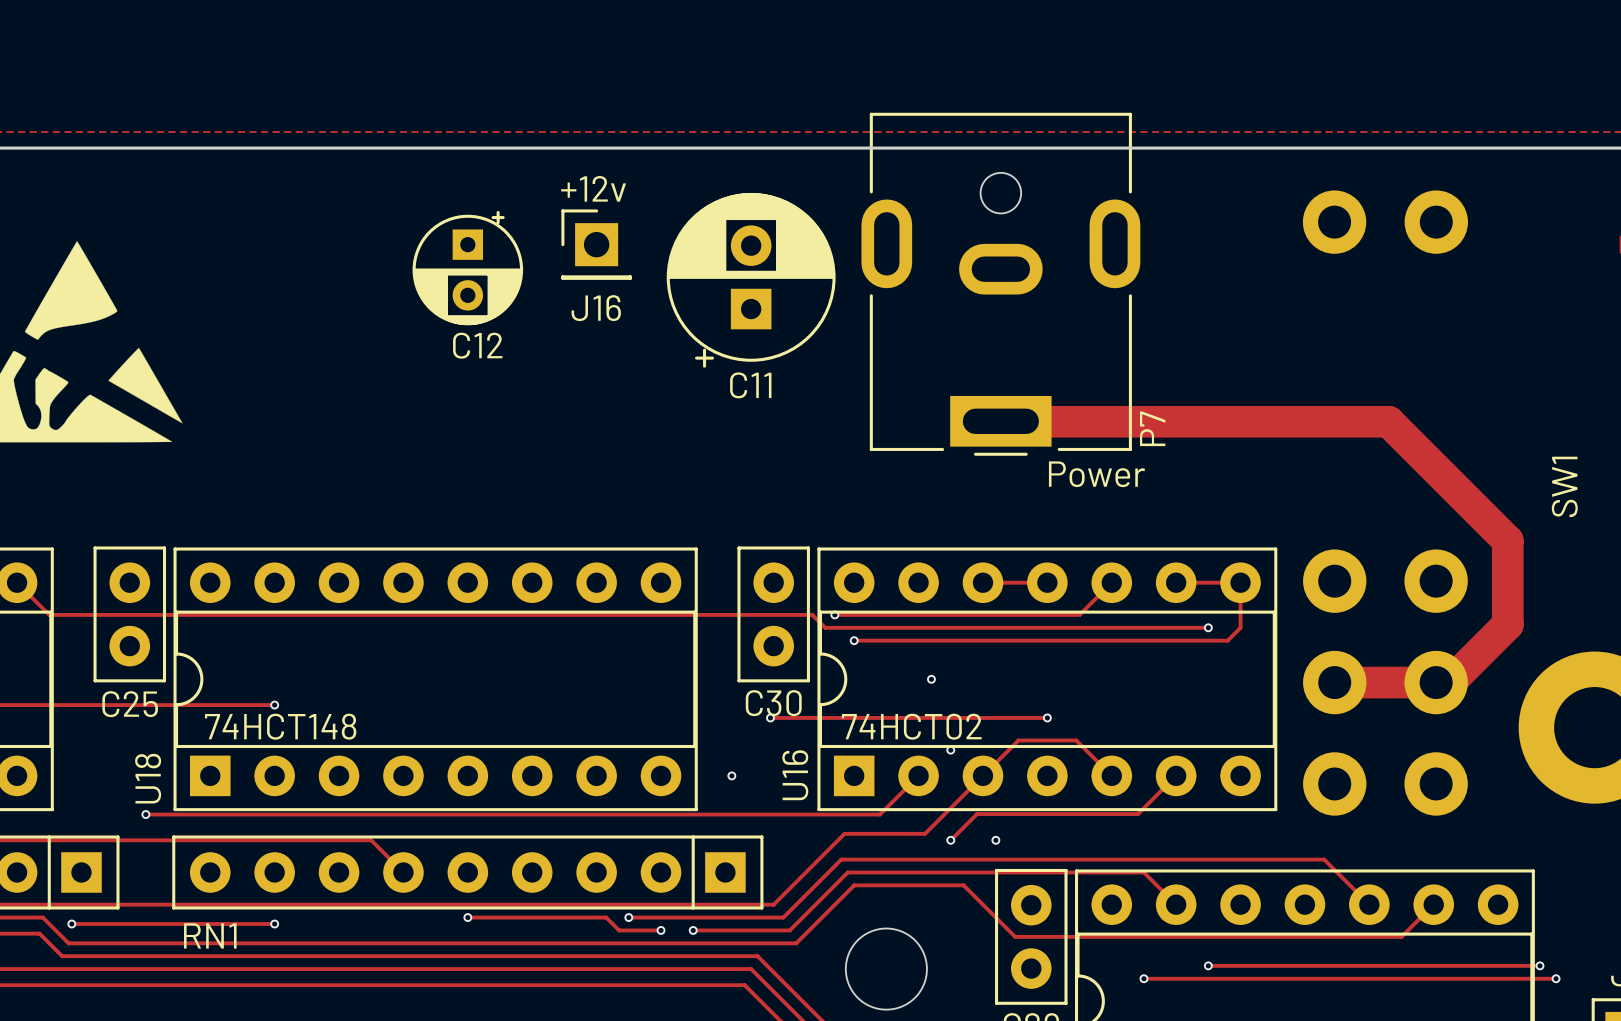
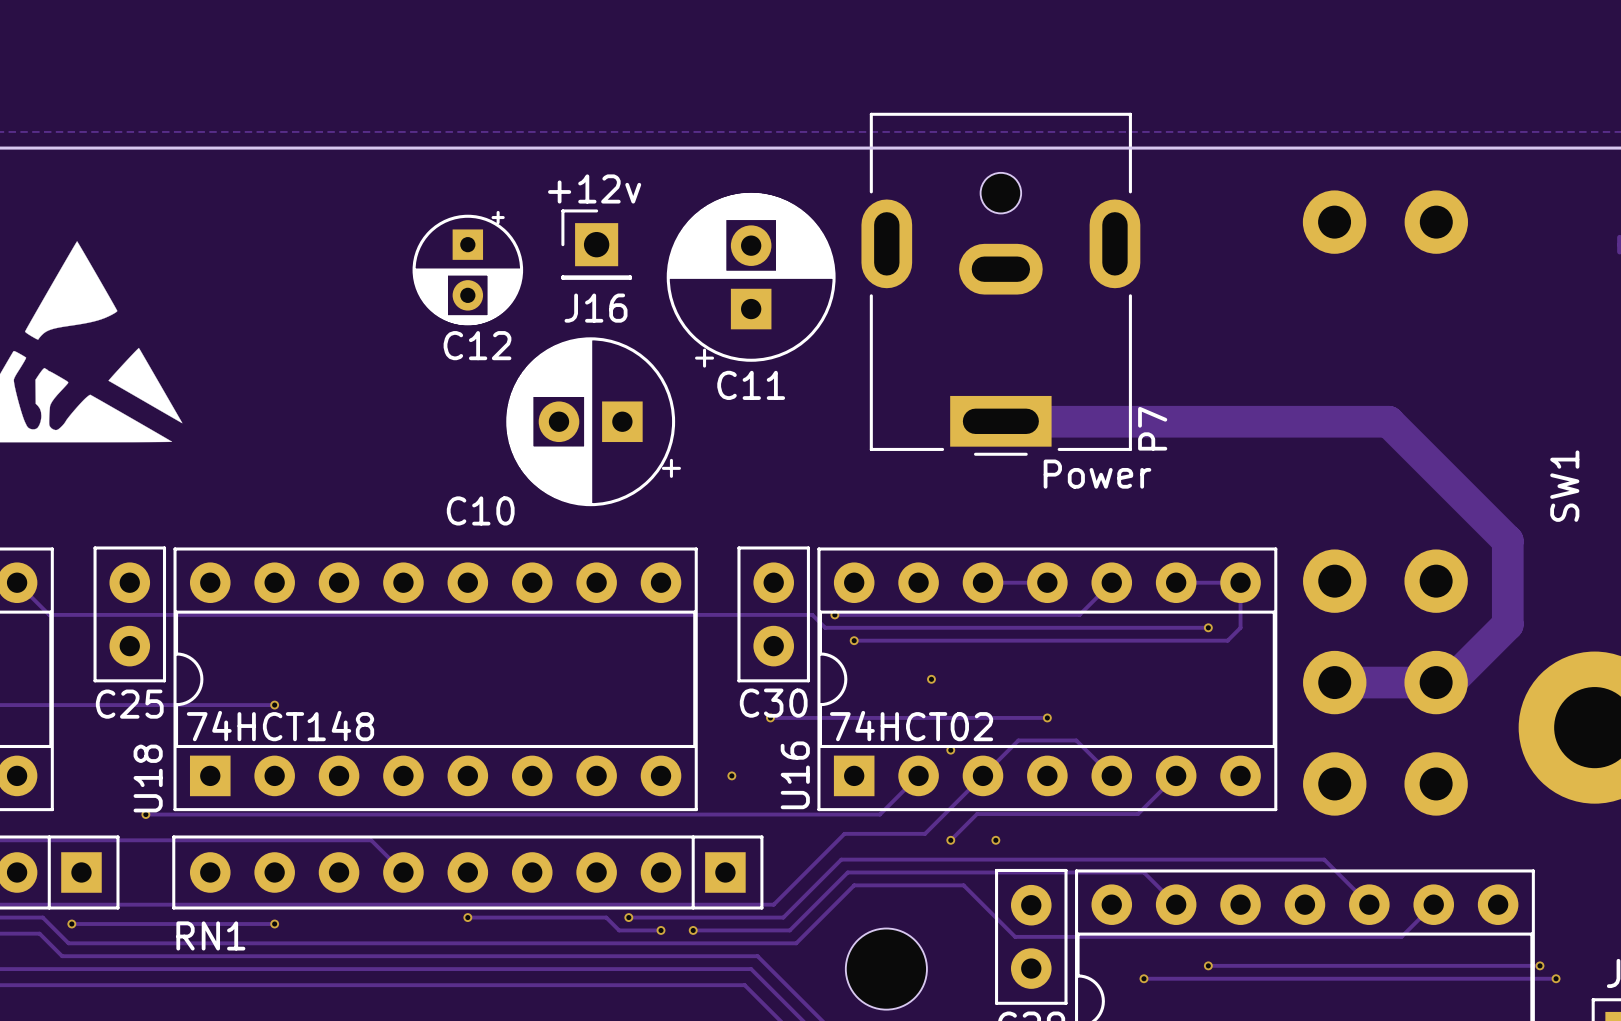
C10: none -> (593, 421)

